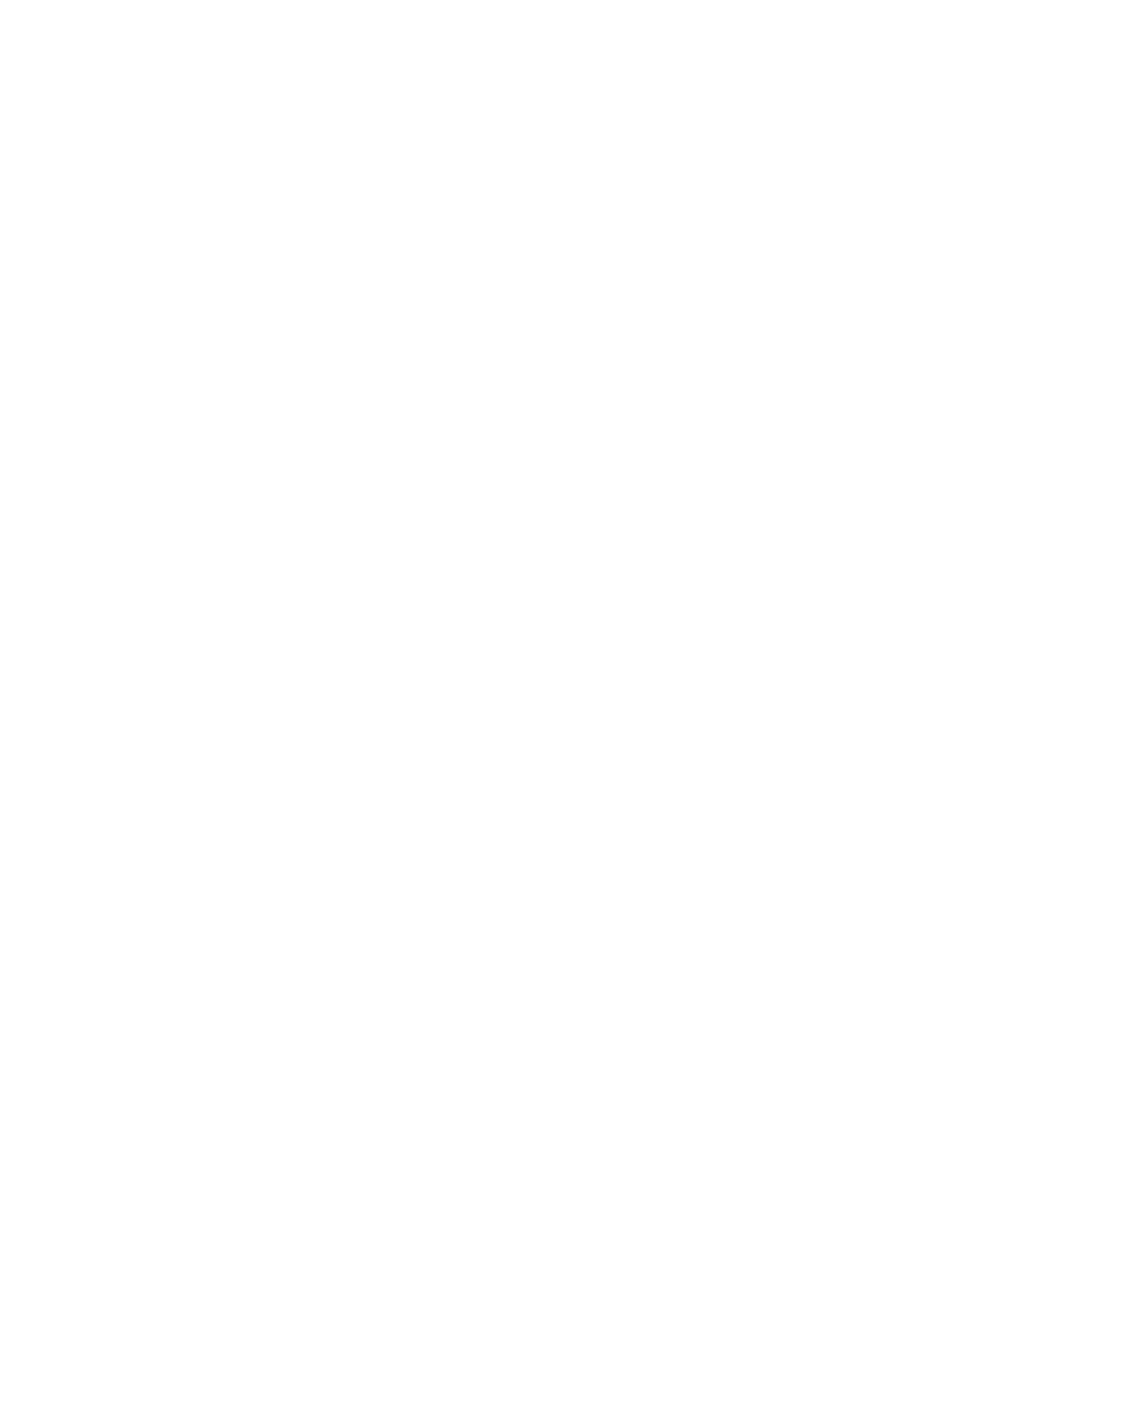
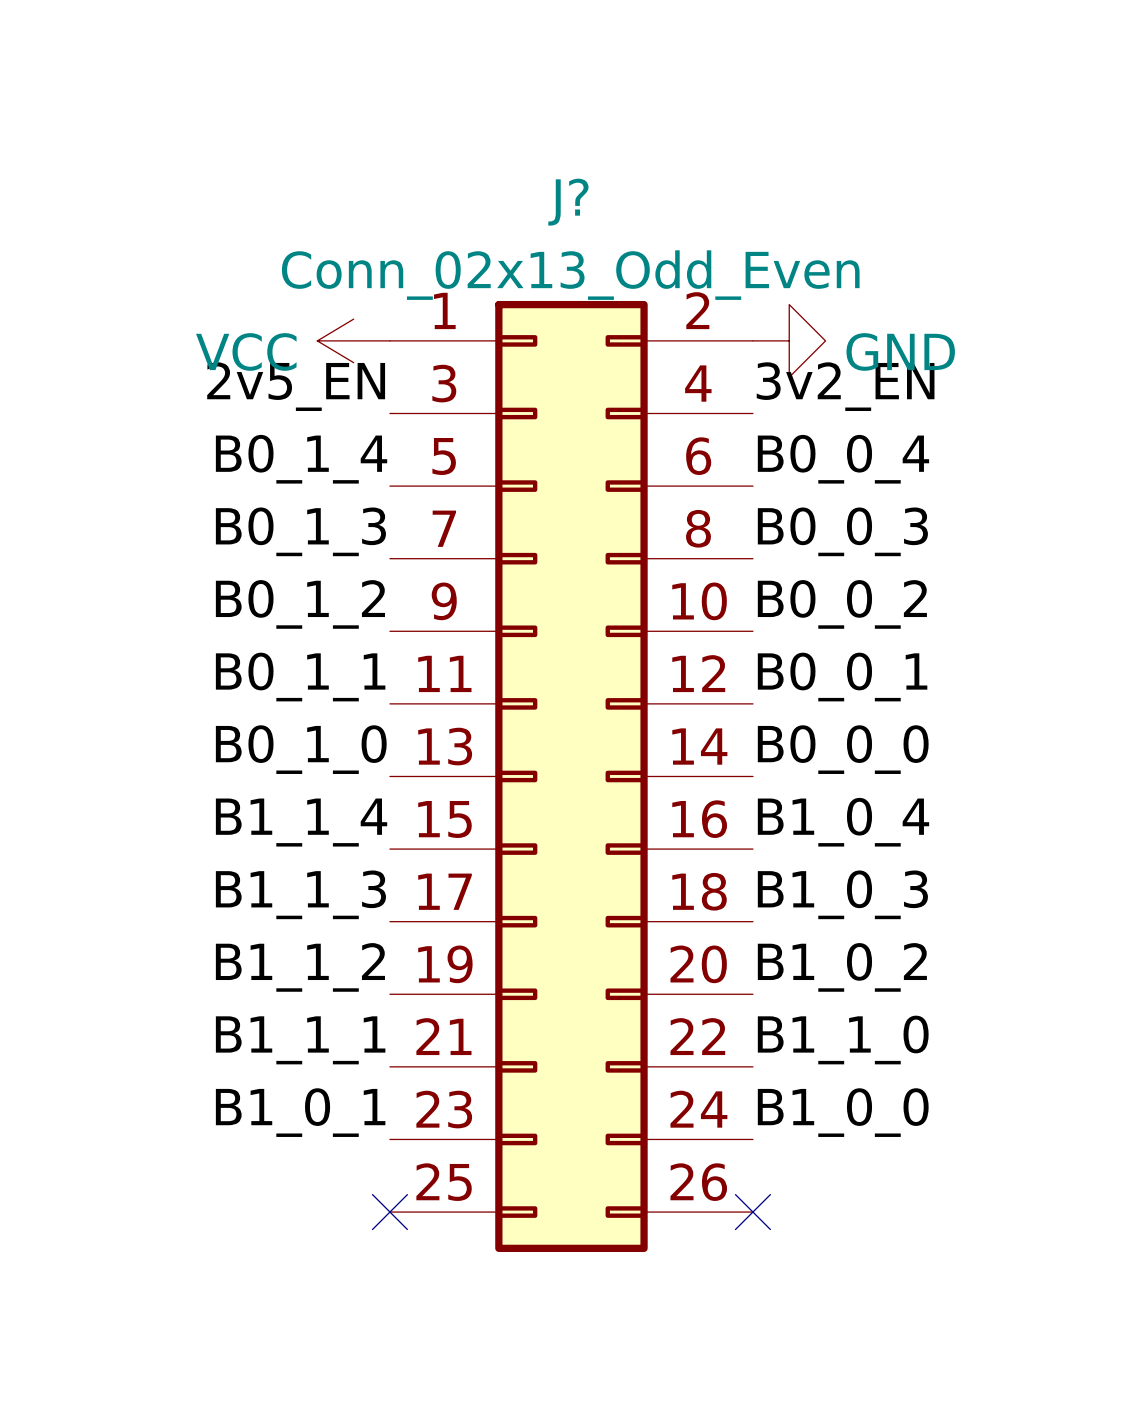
power symbol: none -> VCC (353, 340)
power symbol: none -> GND (789, 340)
label: none -> 2v5_EN (296, 386)
label: none -> 3v2_EN (845, 386)
label: none -> B0_1_4 (301, 459)
label: none -> B0_0_4 (843, 459)
label: none -> B0_1_3 (300, 531)
label: none -> B0_0_3 (842, 531)
label: none -> B0_1_2 (300, 604)
label: none -> B0_0_2 (842, 604)
label: none -> B0_1_1 (300, 677)
label: none -> B0_0_1 (842, 677)
label: none -> B0_1_0 (301, 749)
label: none -> B0_0_0 (843, 749)
J?: none -> Conn_02x13_Odd_Even (571, 776)
label: none -> B1_1_4 (301, 822)
label: none -> B1_0_4 (843, 822)
label: none -> B1_1_3 (300, 894)
label: none -> B1_0_3 (842, 894)
label: none -> B1_1_2 (300, 967)
label: none -> B1_0_2 (842, 967)
label: none -> B1_1_1 (300, 1040)
label: none -> B1_1_0 (843, 1040)
label: none -> B1_0_1 (300, 1112)
label: none -> B1_0_0 (843, 1112)
no-connect mark: none -> (389, 1212)
no-connect mark: none -> (752, 1212)

